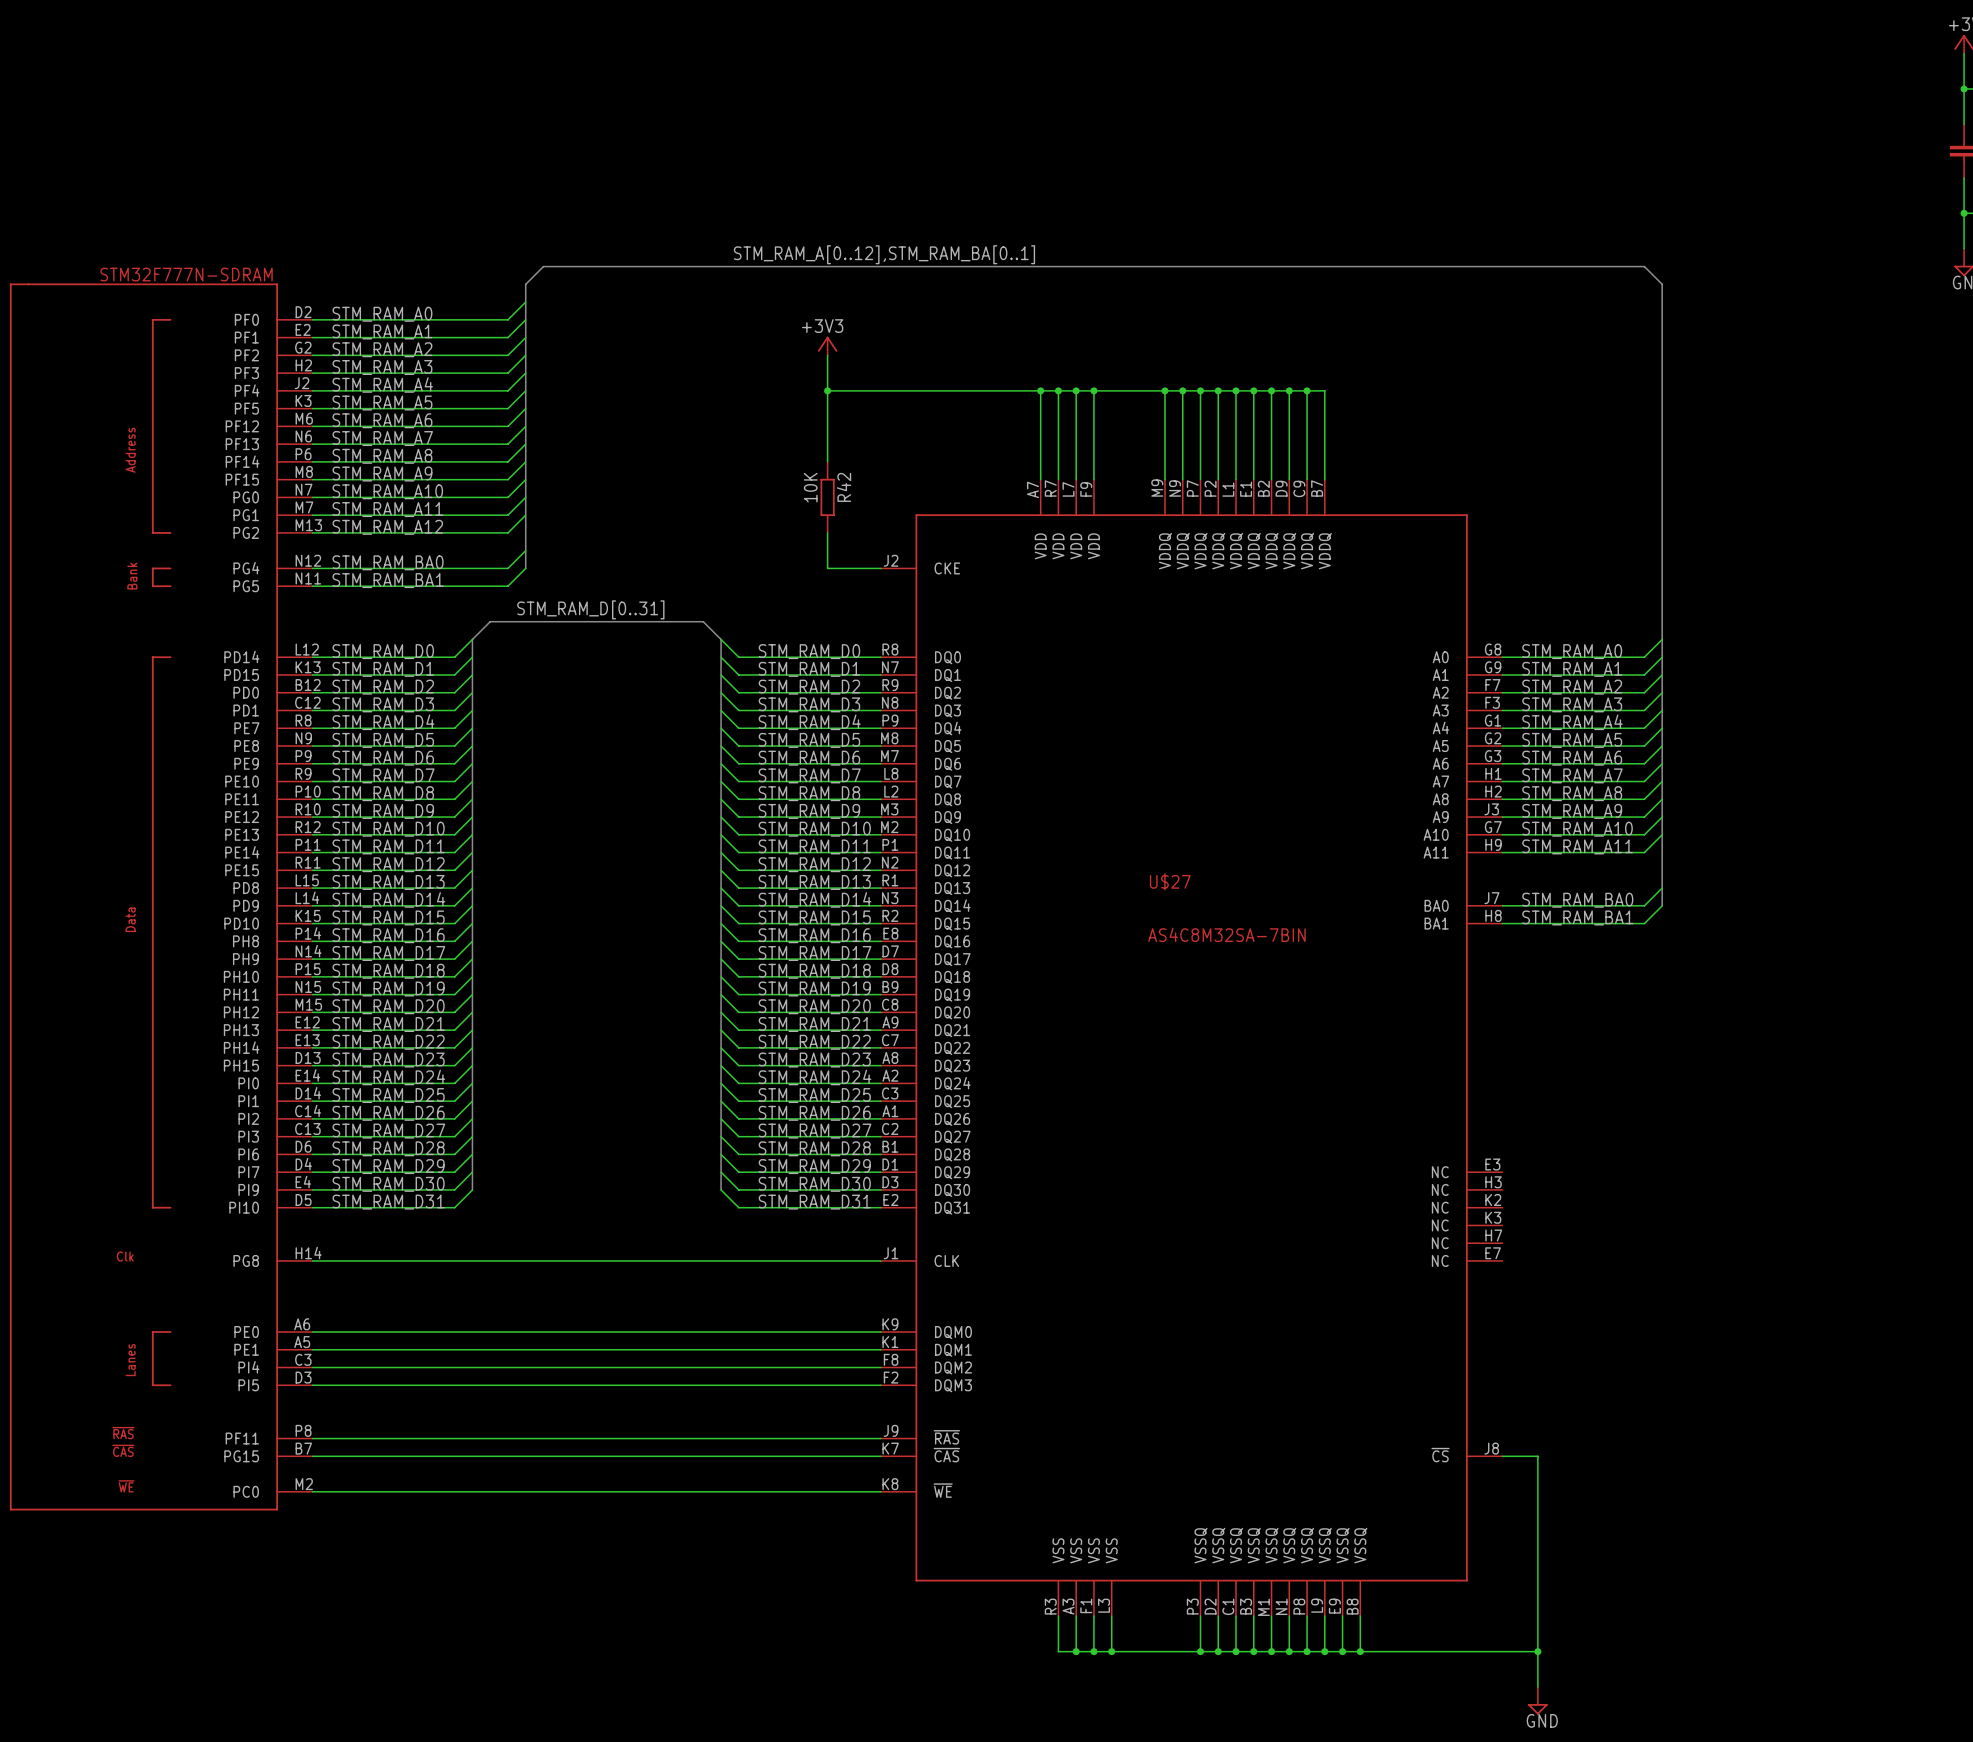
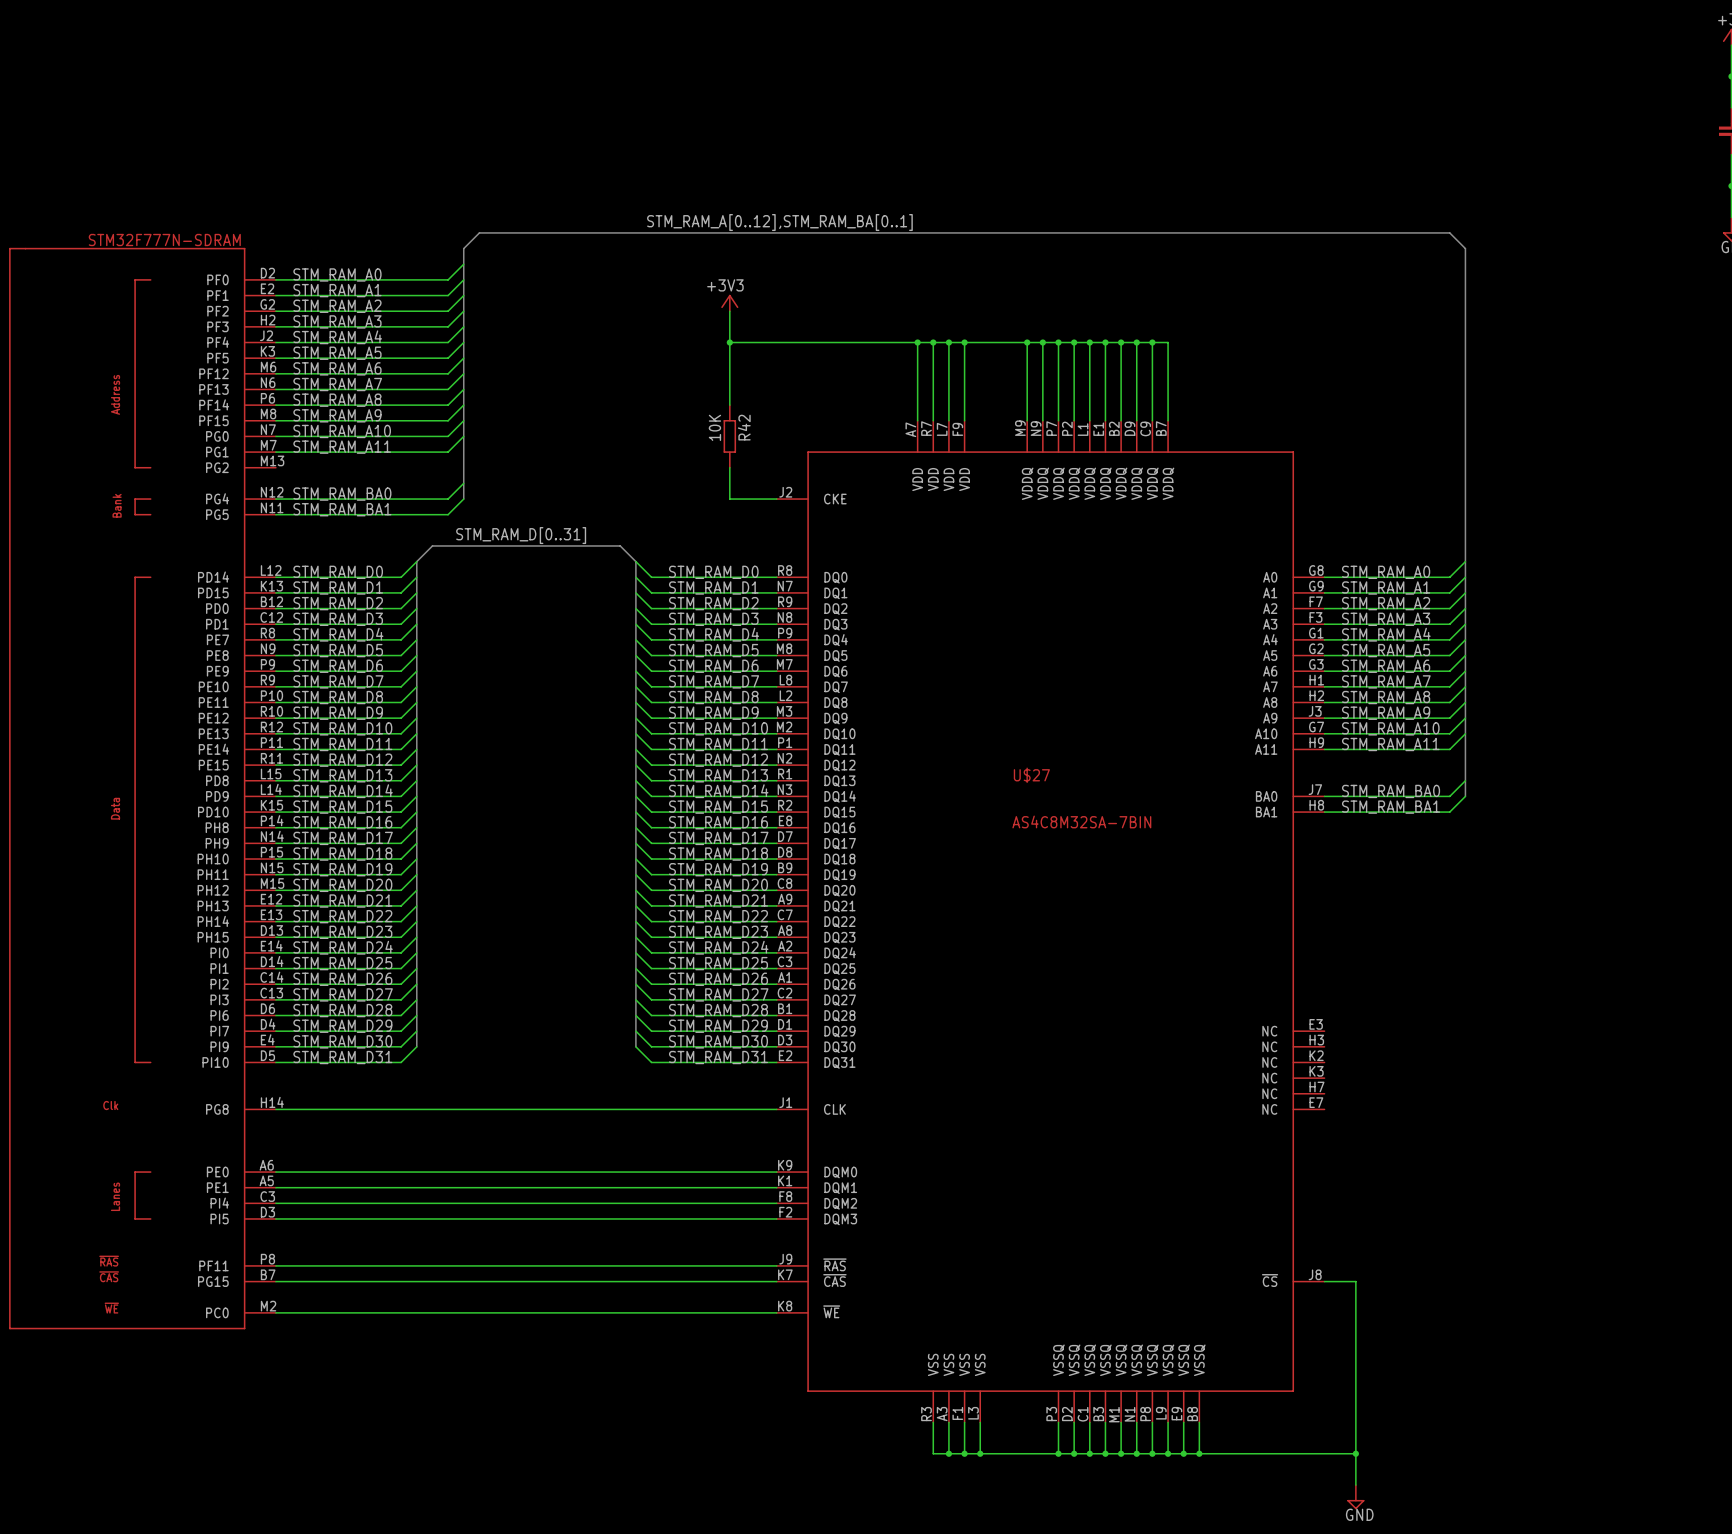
wire: (525, 515) (507, 532) (312, 532) -> none
label: STM_RAM_A12 (387, 527) -> none

